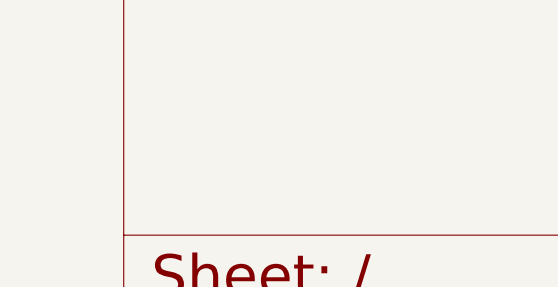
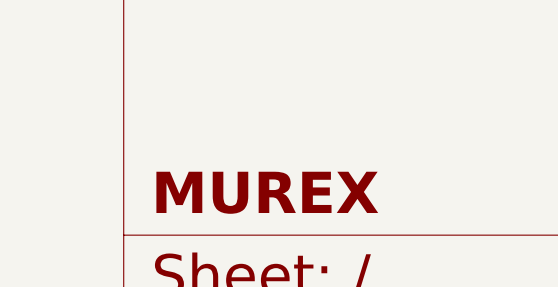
title block: none -> MUREX (267, 192)

